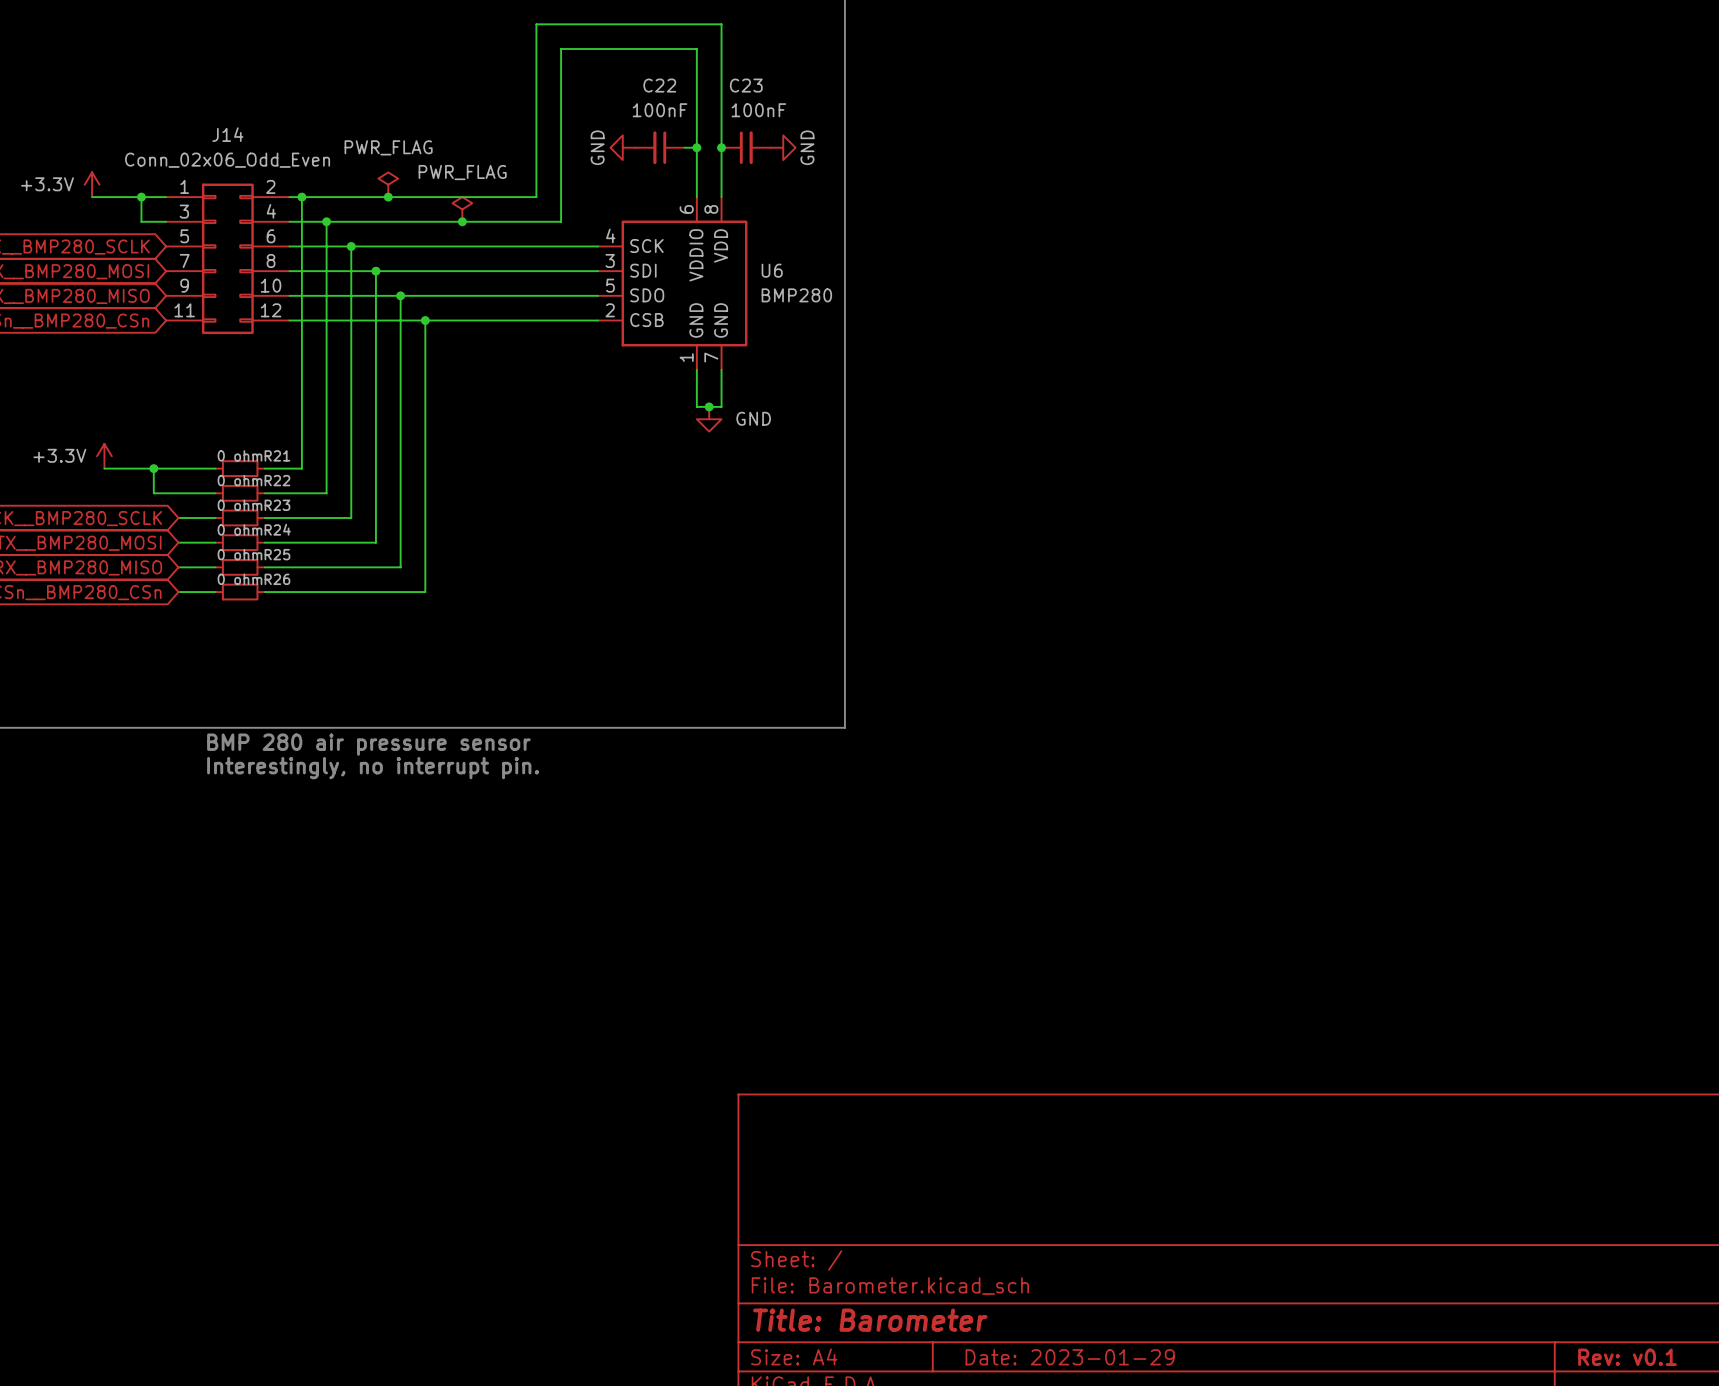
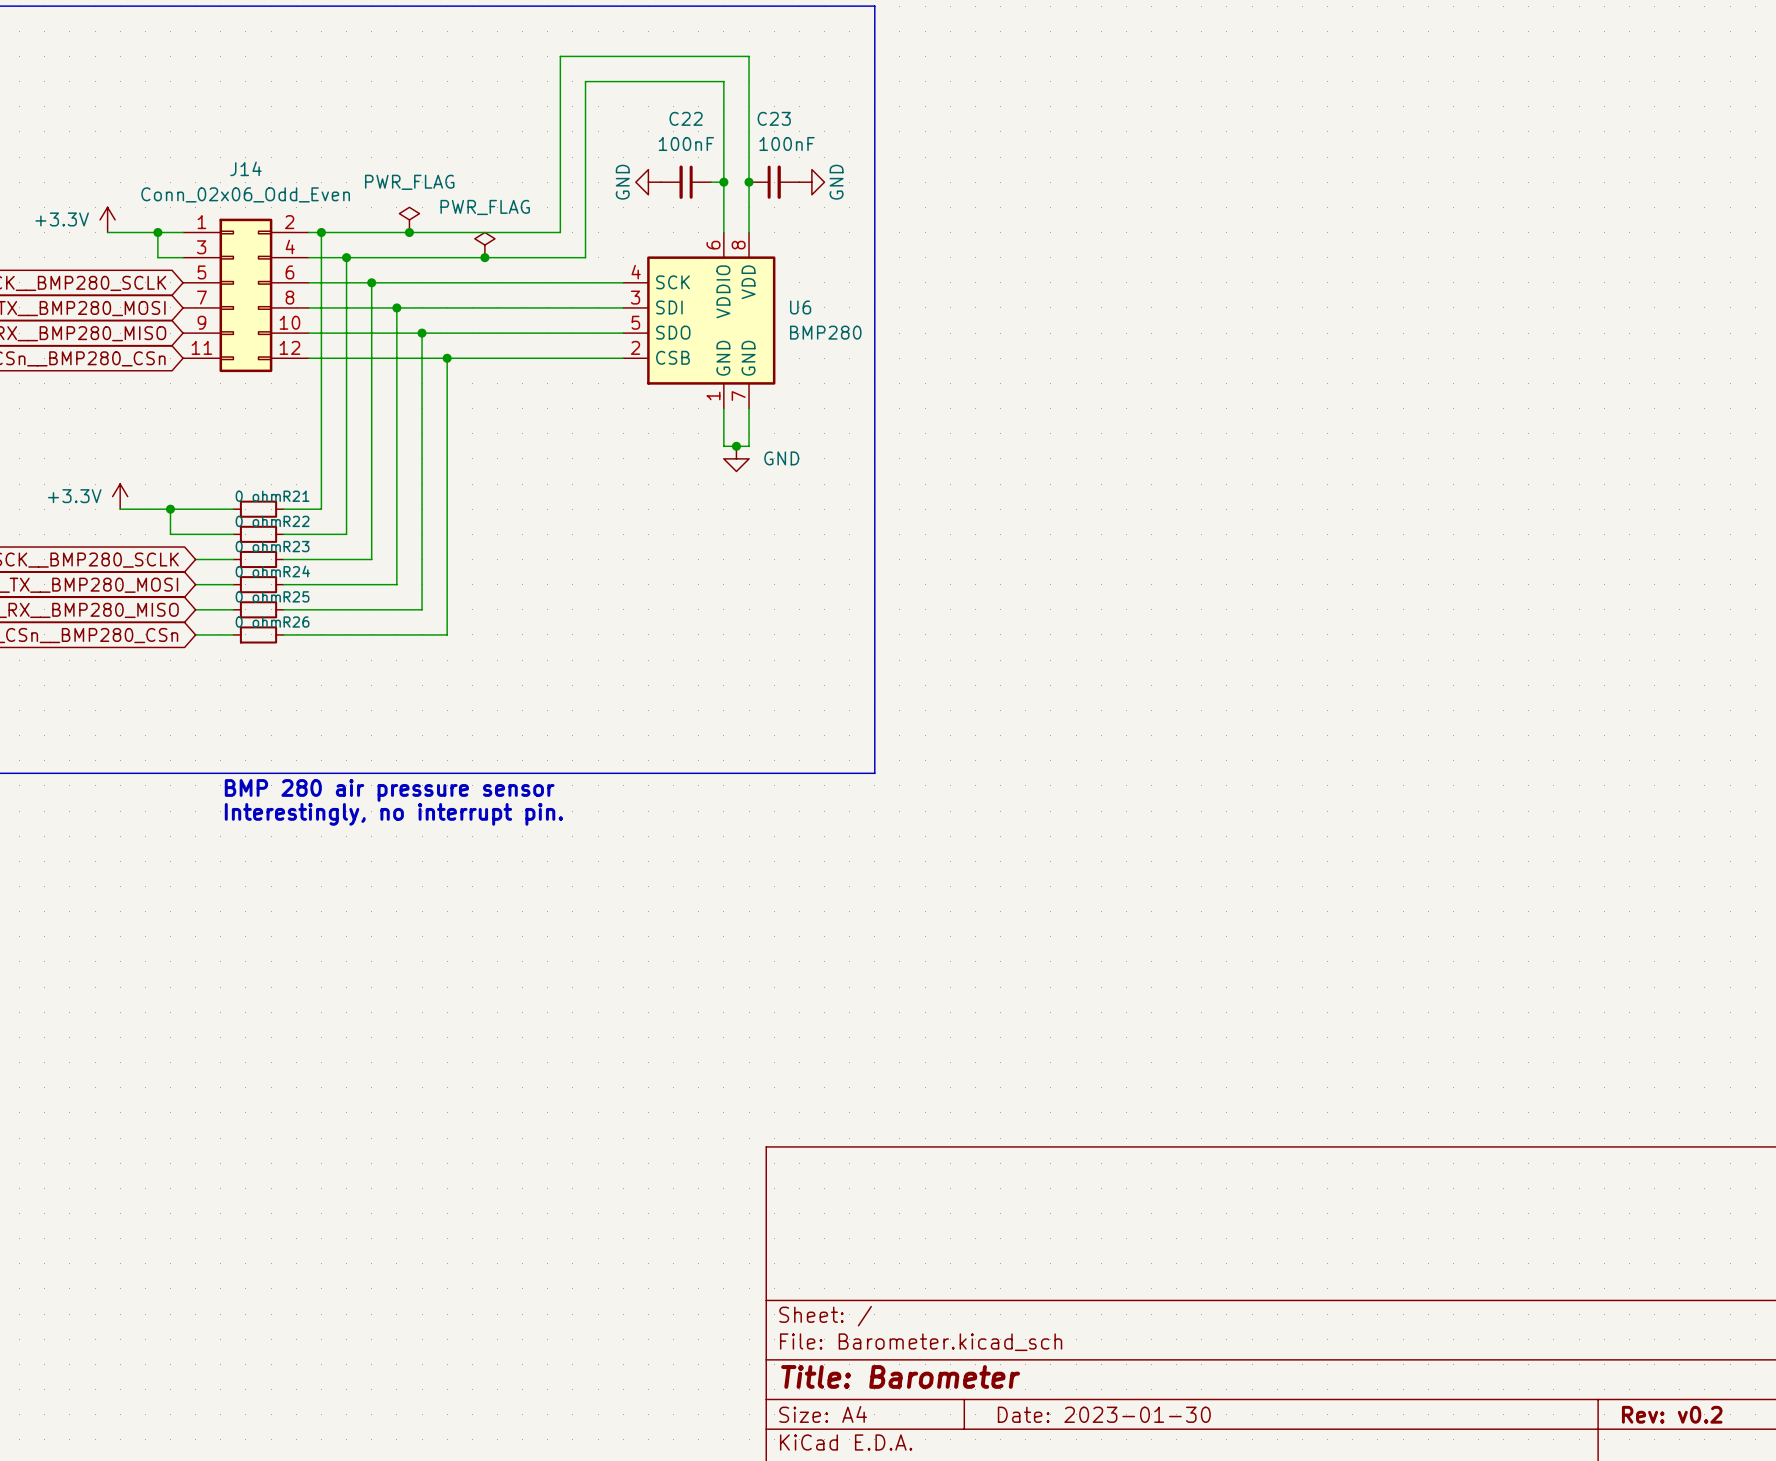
title block: Date: 2023-01-29 (1070, 1357) -> Date: 2023-01-30 (1104, 1414)
title block: Rev: v0.1 (1627, 1357) -> Rev: v0.2 (1672, 1414)

